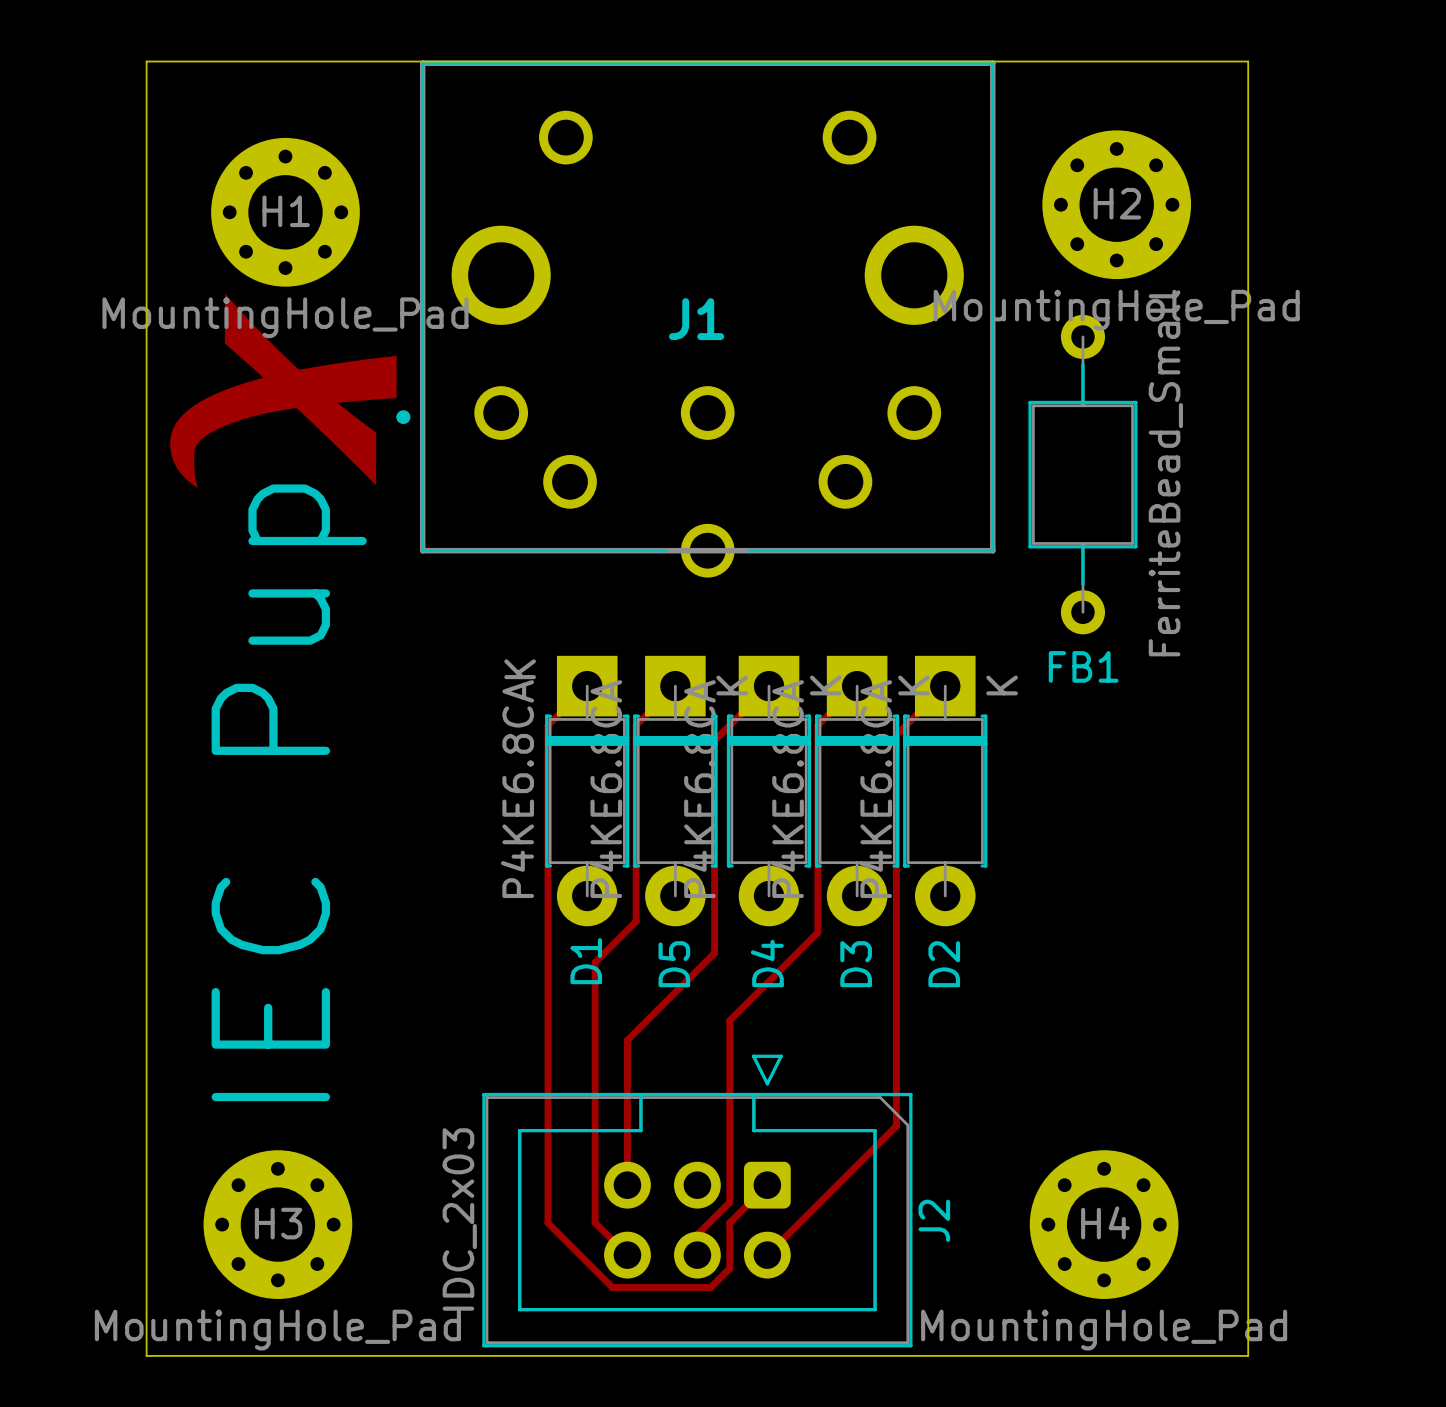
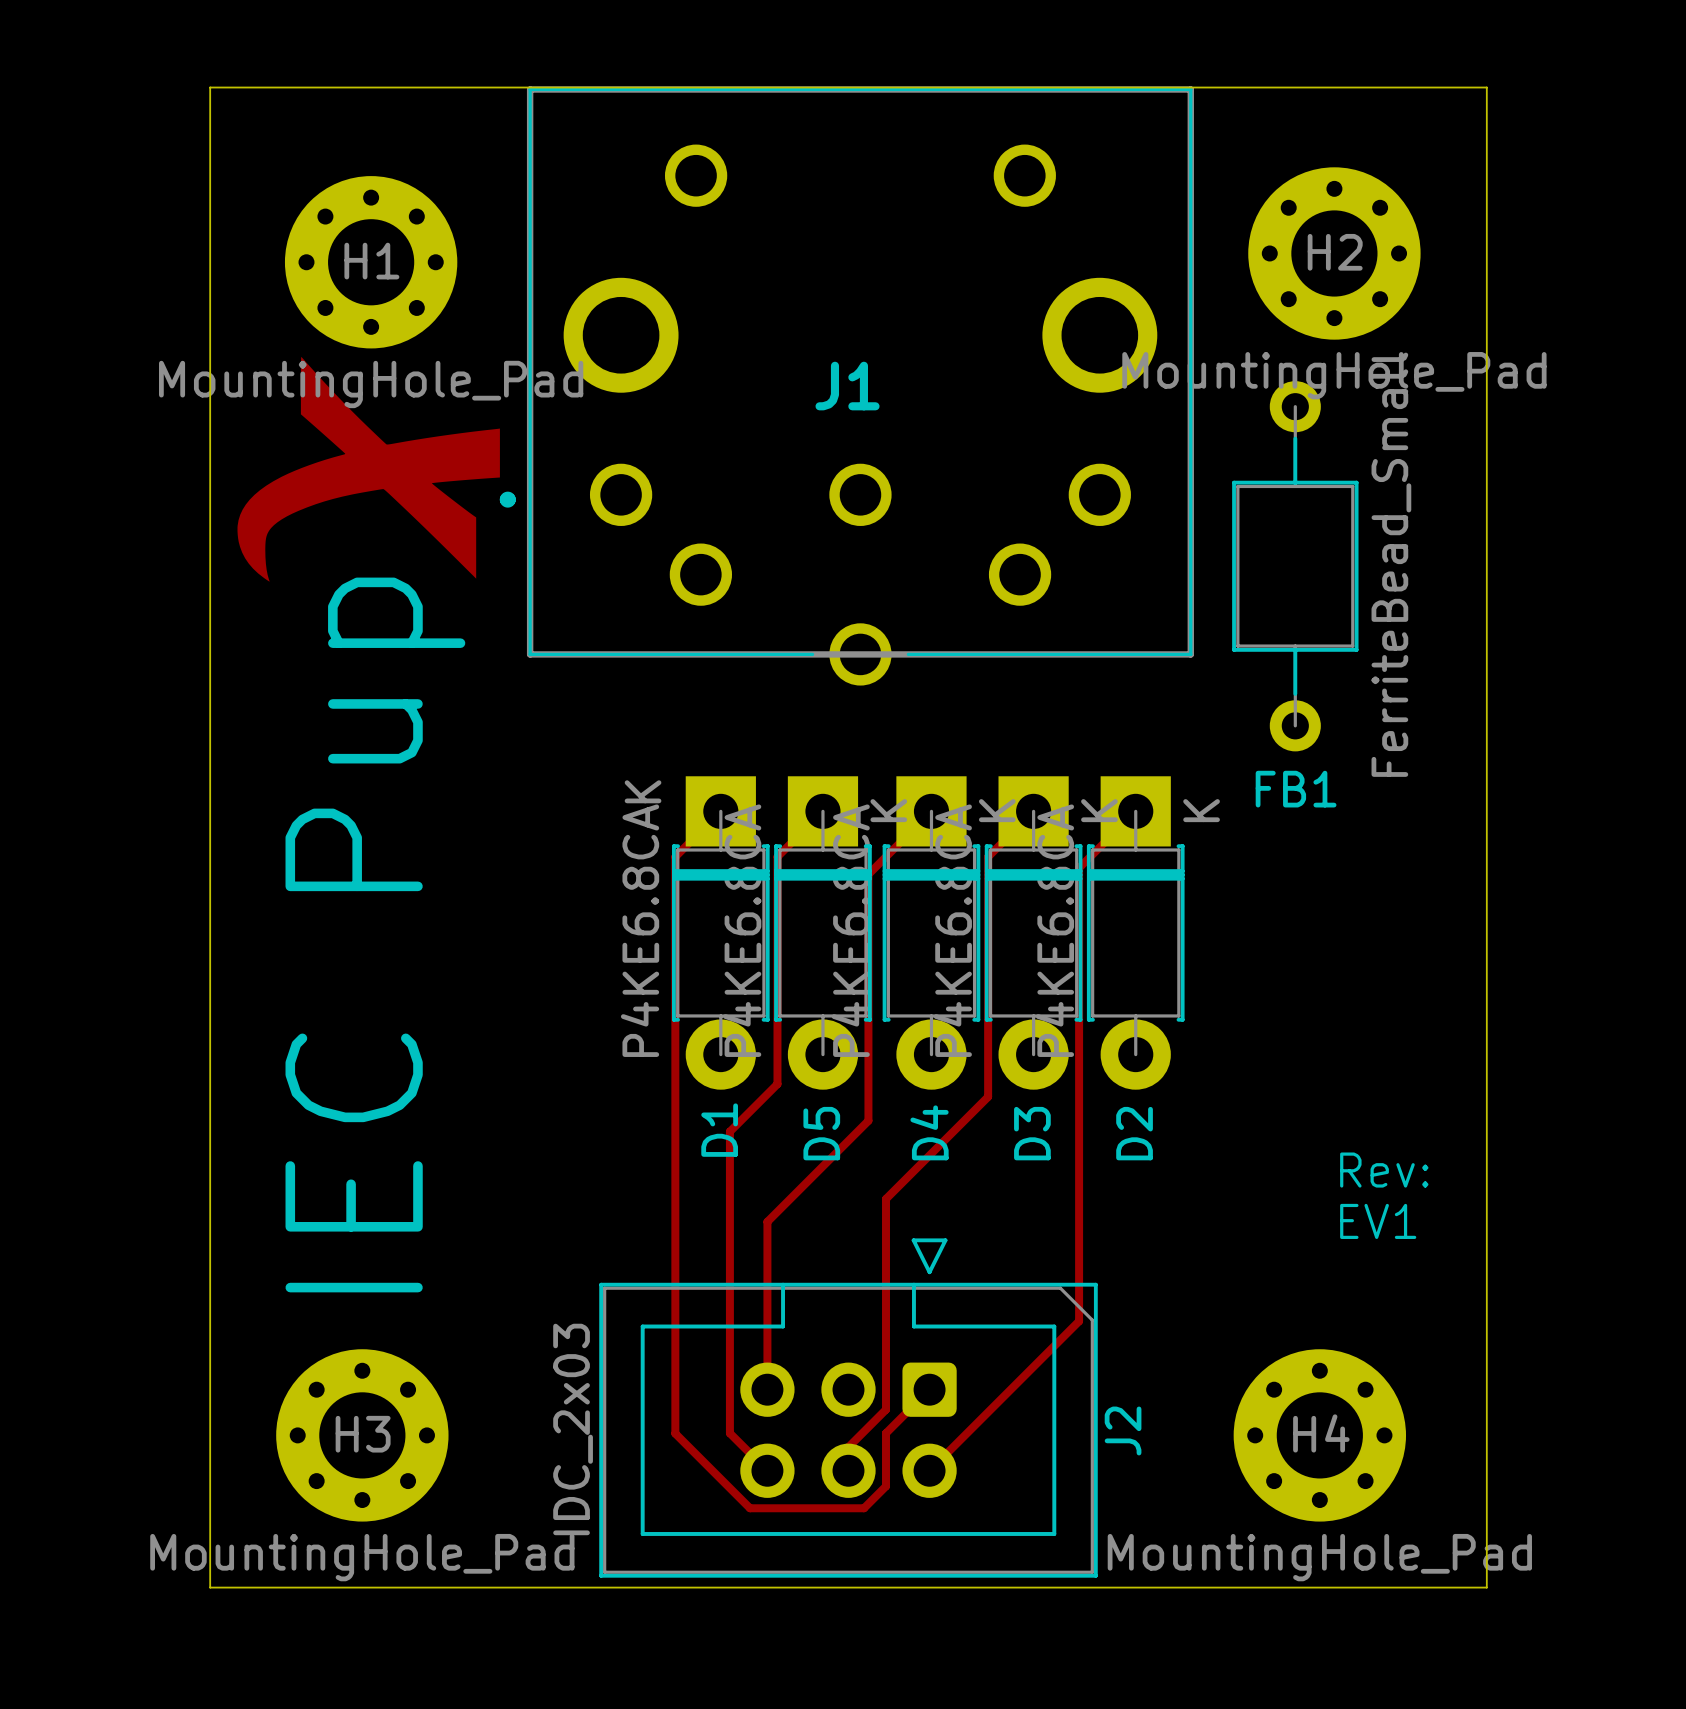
text: none -> Rev: (1384, 1170)
text: none -> EV1 (1378, 1221)

